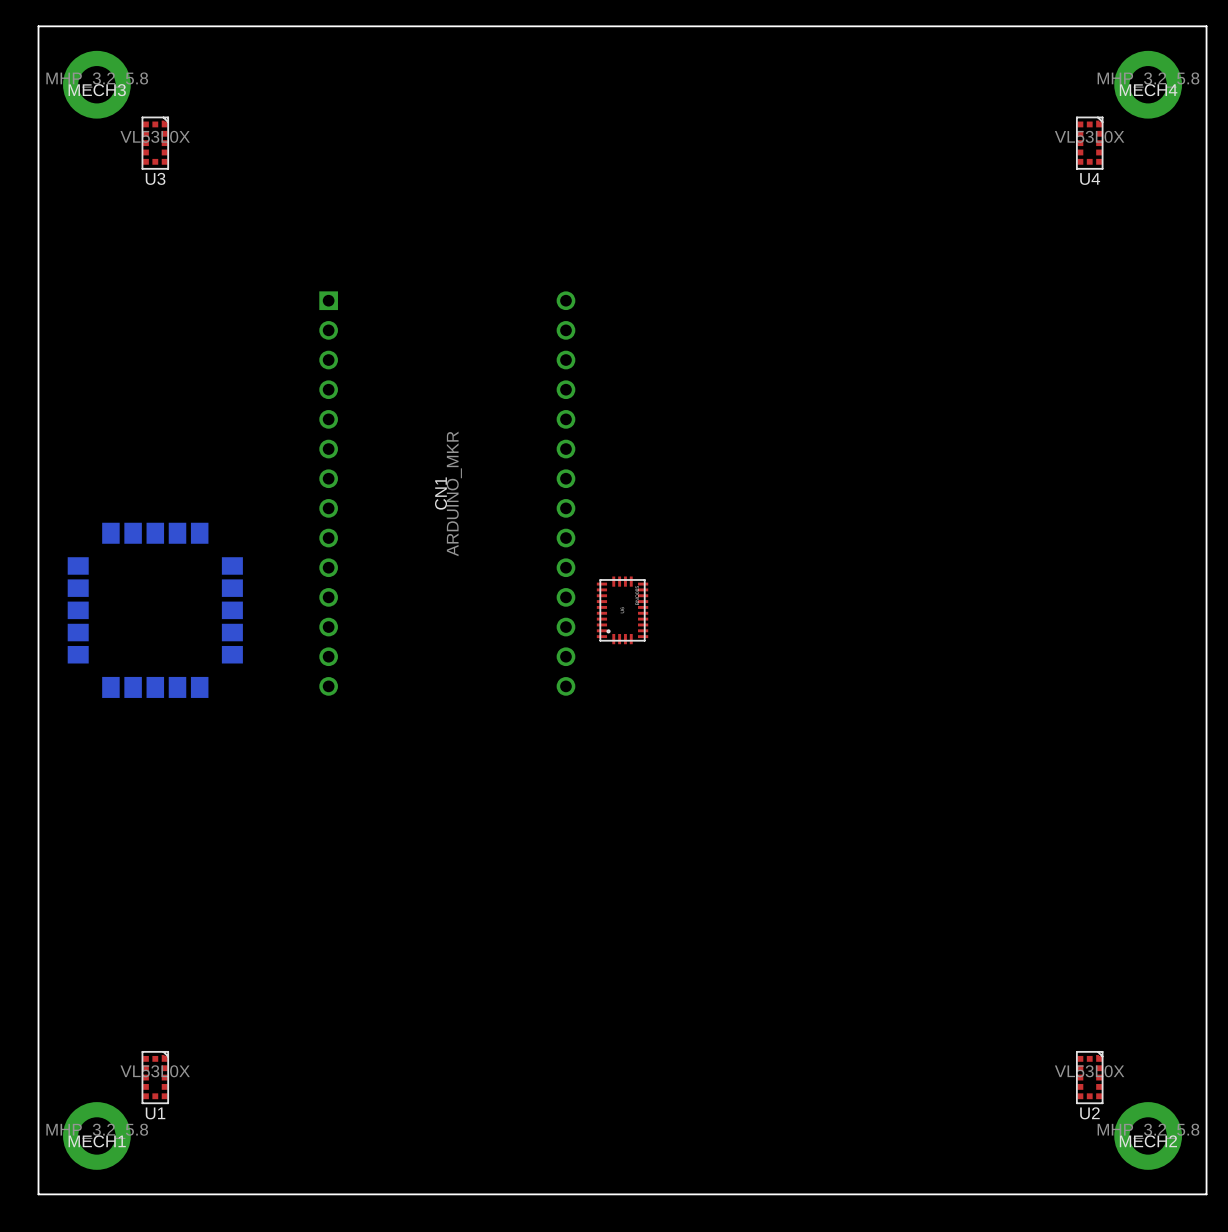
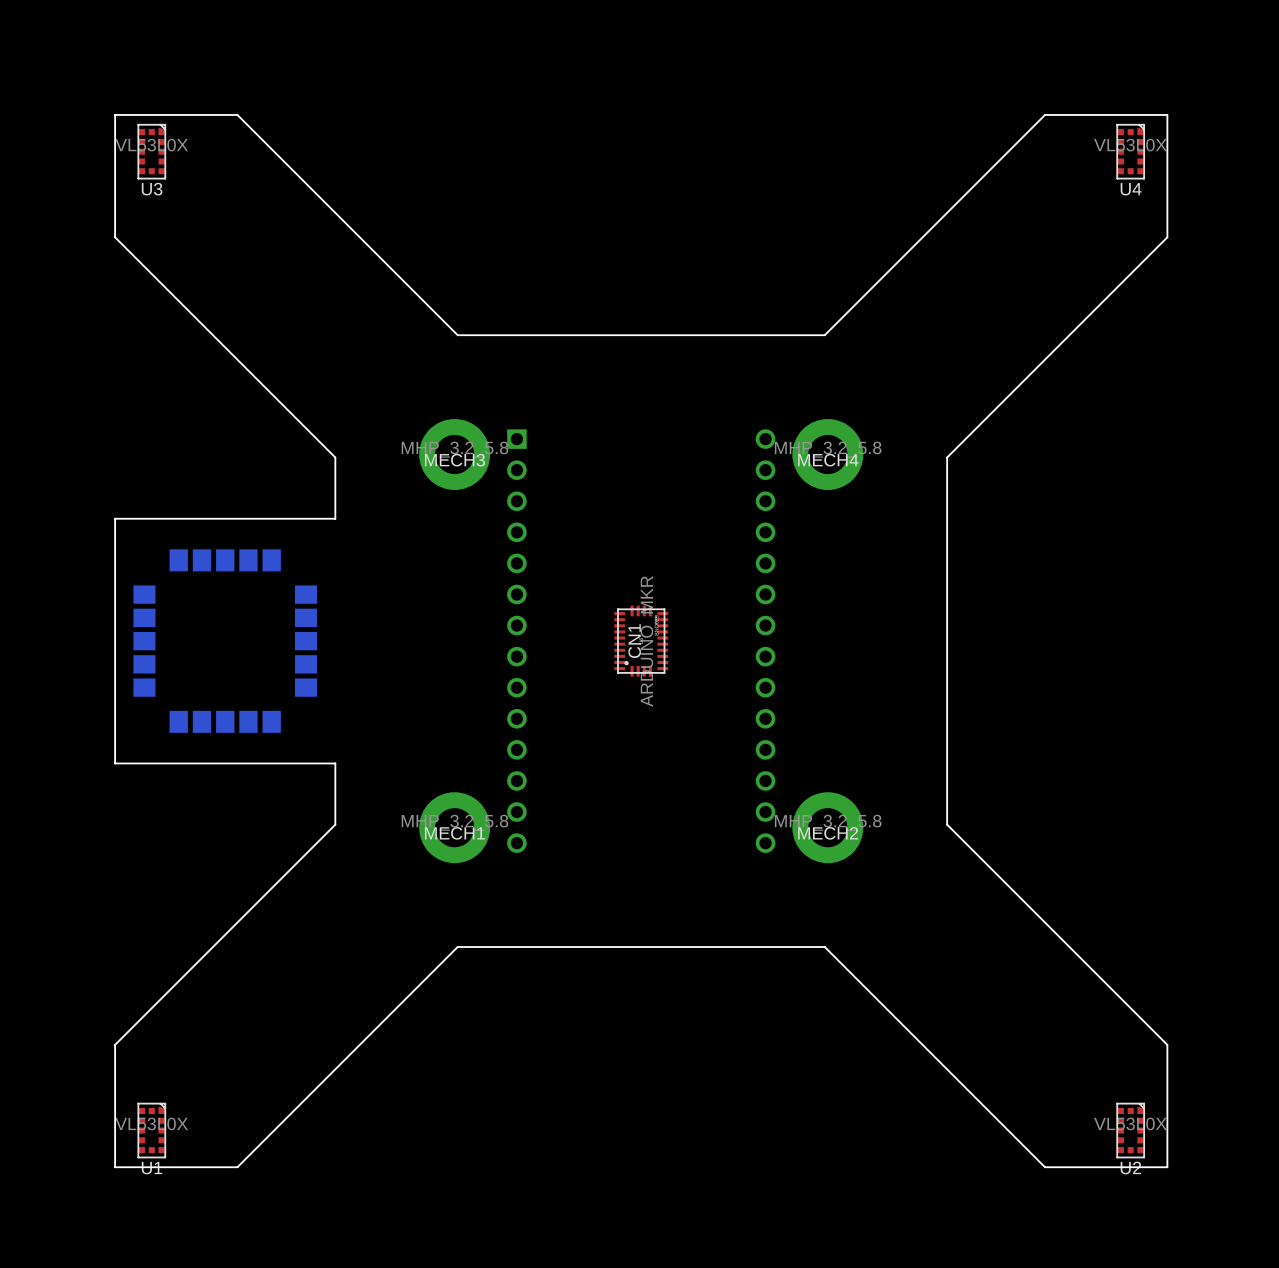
board edge: (38, 26) (38, 1194) (1206, 1194) (1206, 26) (38, 26) -> (115, 114) (115, 237) (335, 457) (335, 518) (115, 518) (115, 763) (335, 763) (335, 824) (115, 1044) (115, 1167) (237, 1167) (457, 947) (824, 947) (1045, 1167) (1167, 1167) (1167, 1044) (947, 824) (947, 457) (1167, 237) (1167, 114) (1045, 114) (824, 335) (457, 335) (237, 114) (115, 114)
MECH3 position: (96, 84) -> (454, 454)
MECH4 position: (1148, 84) -> (827, 454)
CN1 position: (447, 493) -> (641, 641)
part position: (155, 610) -> (225, 641)
MECH1 position: (96, 1135) -> (454, 827)
MECH2 position: (1148, 1135) -> (827, 827)

